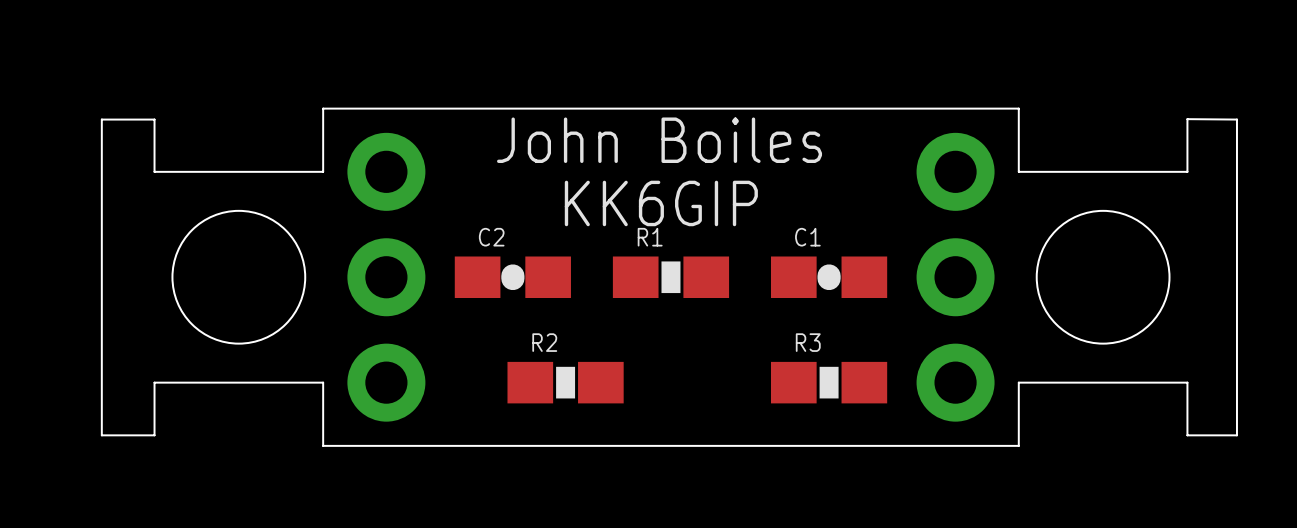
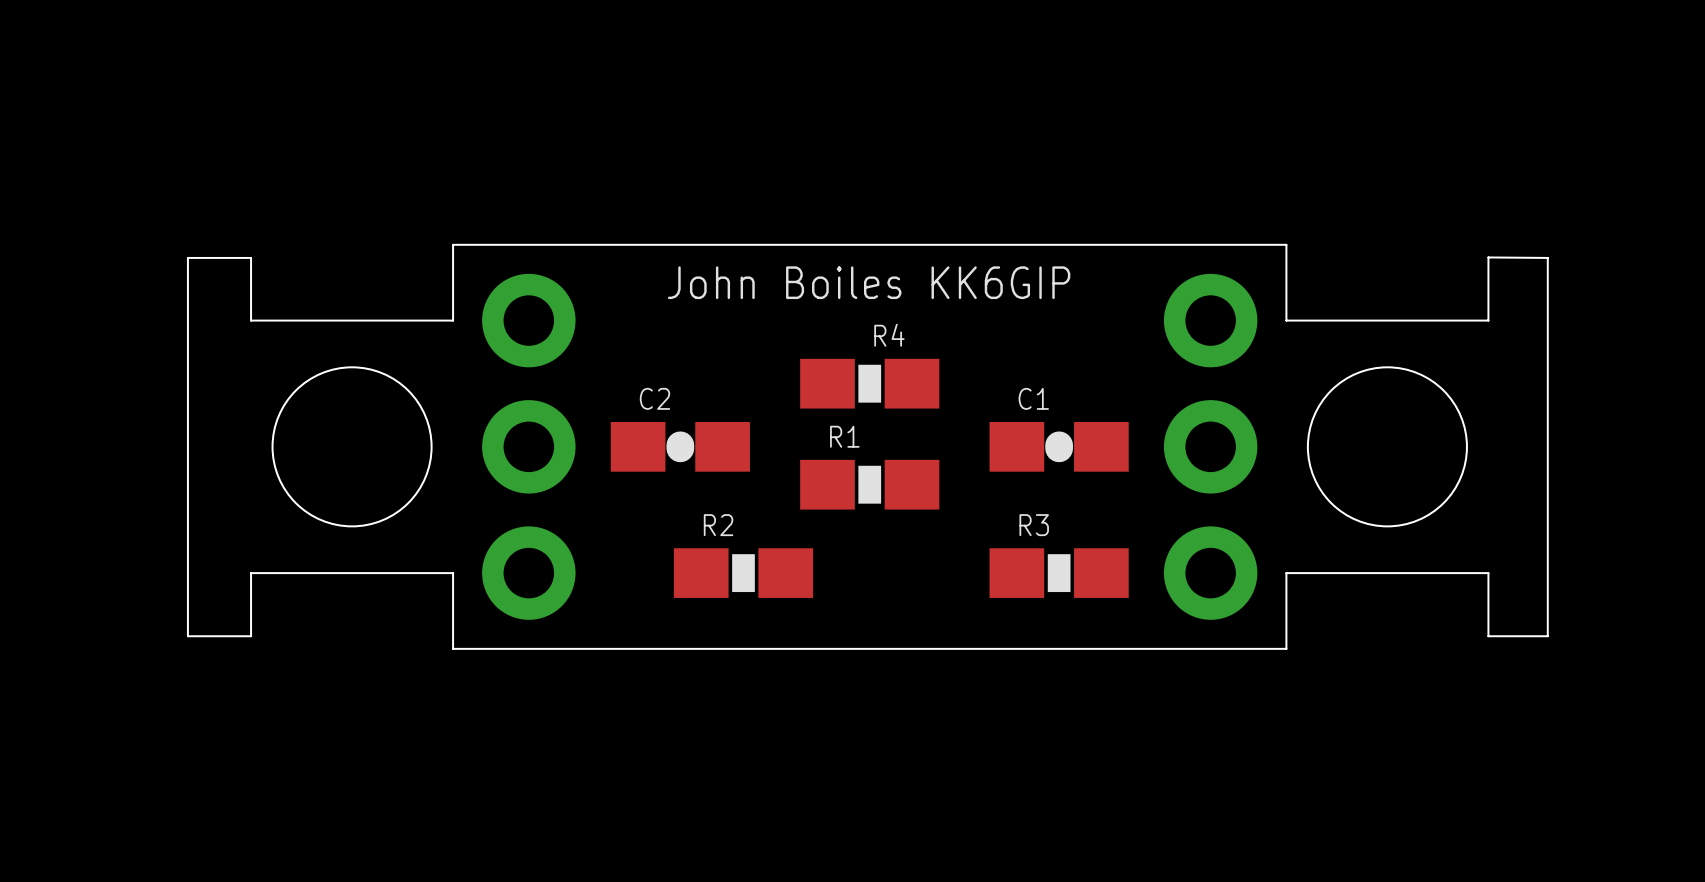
text: John Boiles (659, 140) -> John Boiles KK6GIP (869, 282)
text: KK6GIP (661, 203) -> none
R4: none -> (869, 383)
R1 position: (670, 277) -> (869, 484)

